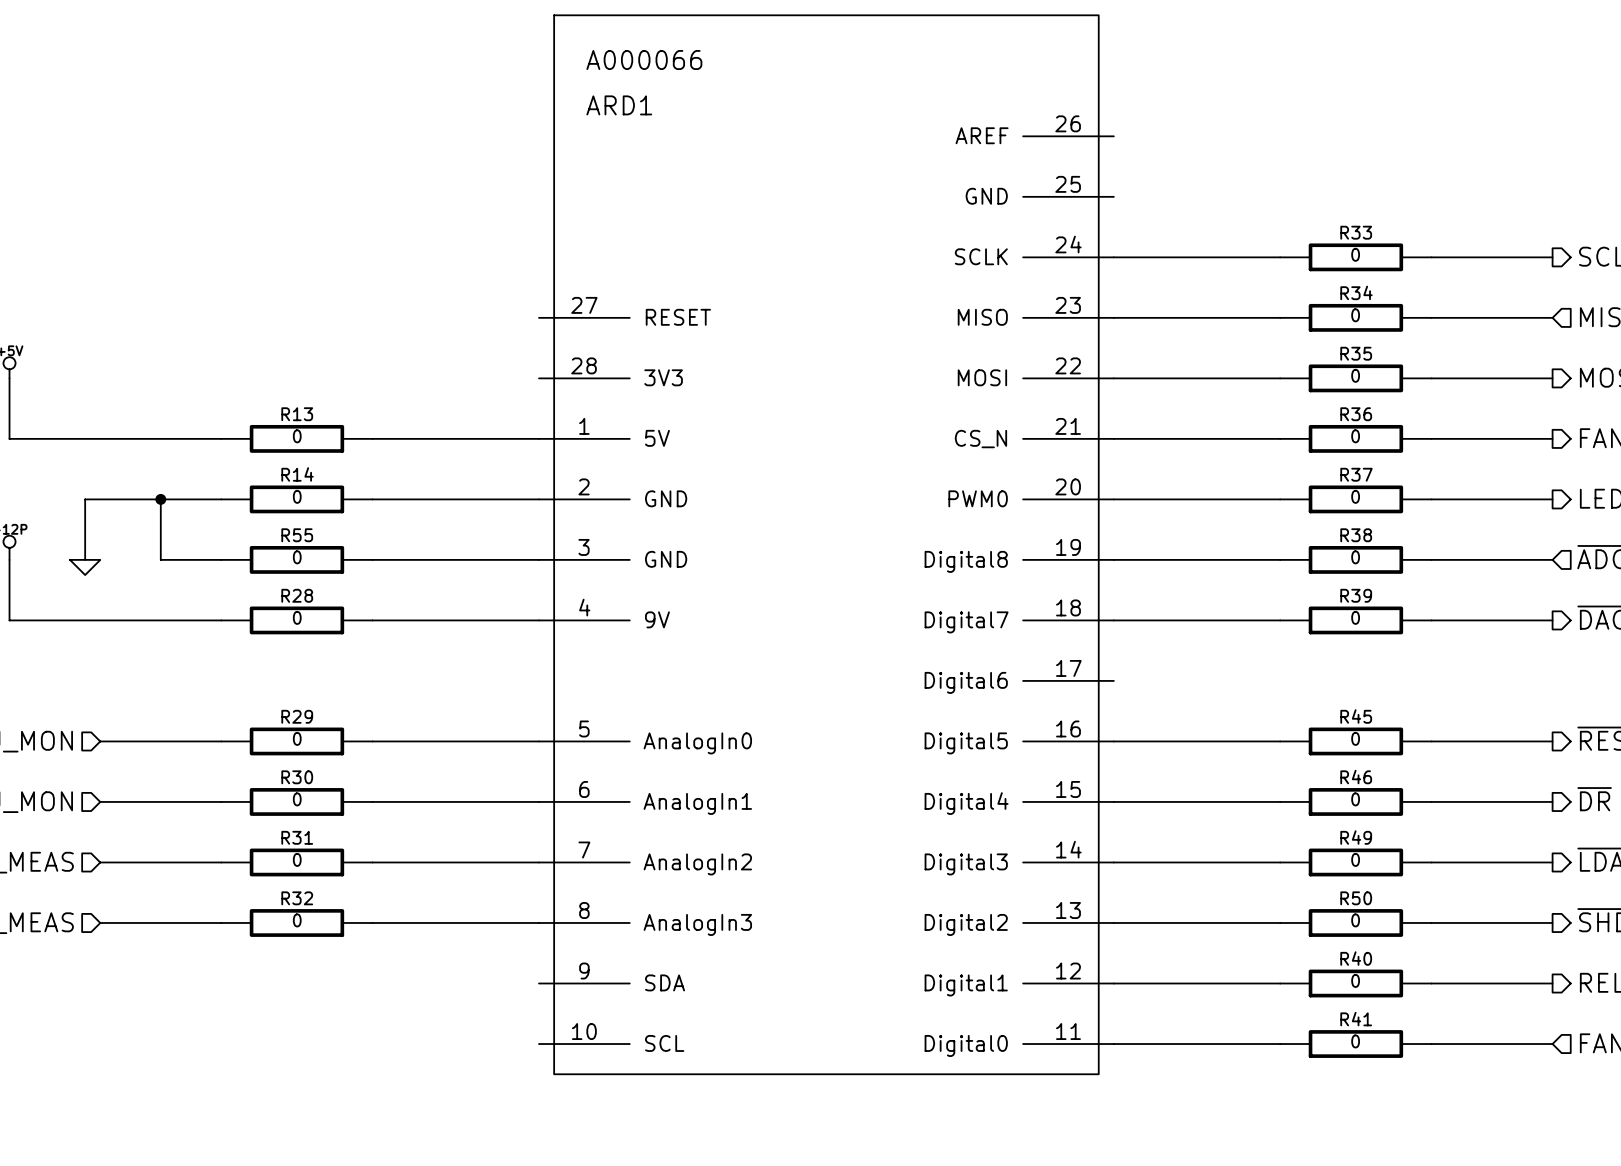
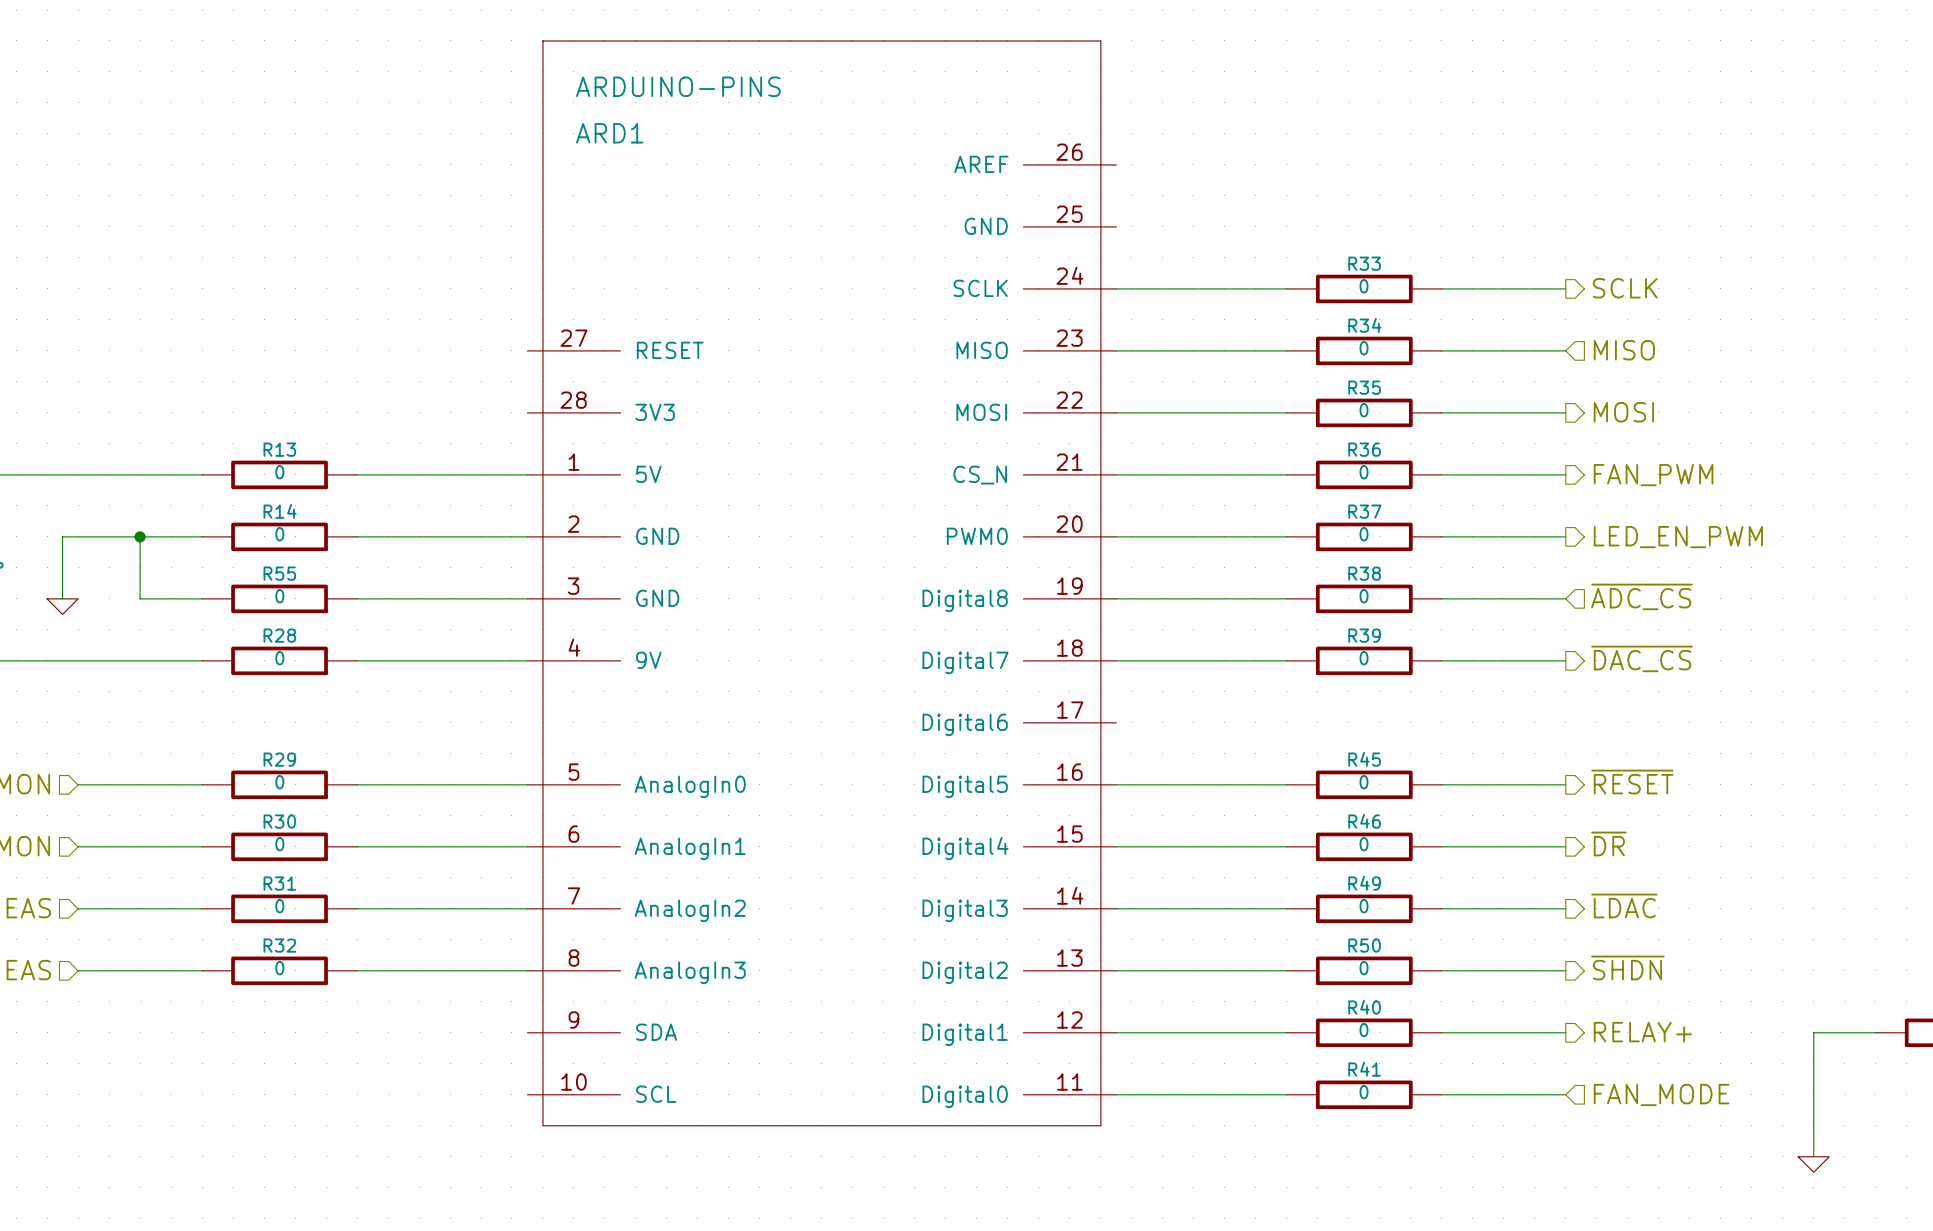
ARD1 value: A000066 (644, 60) -> ARDUINO-PINS (678, 86)

